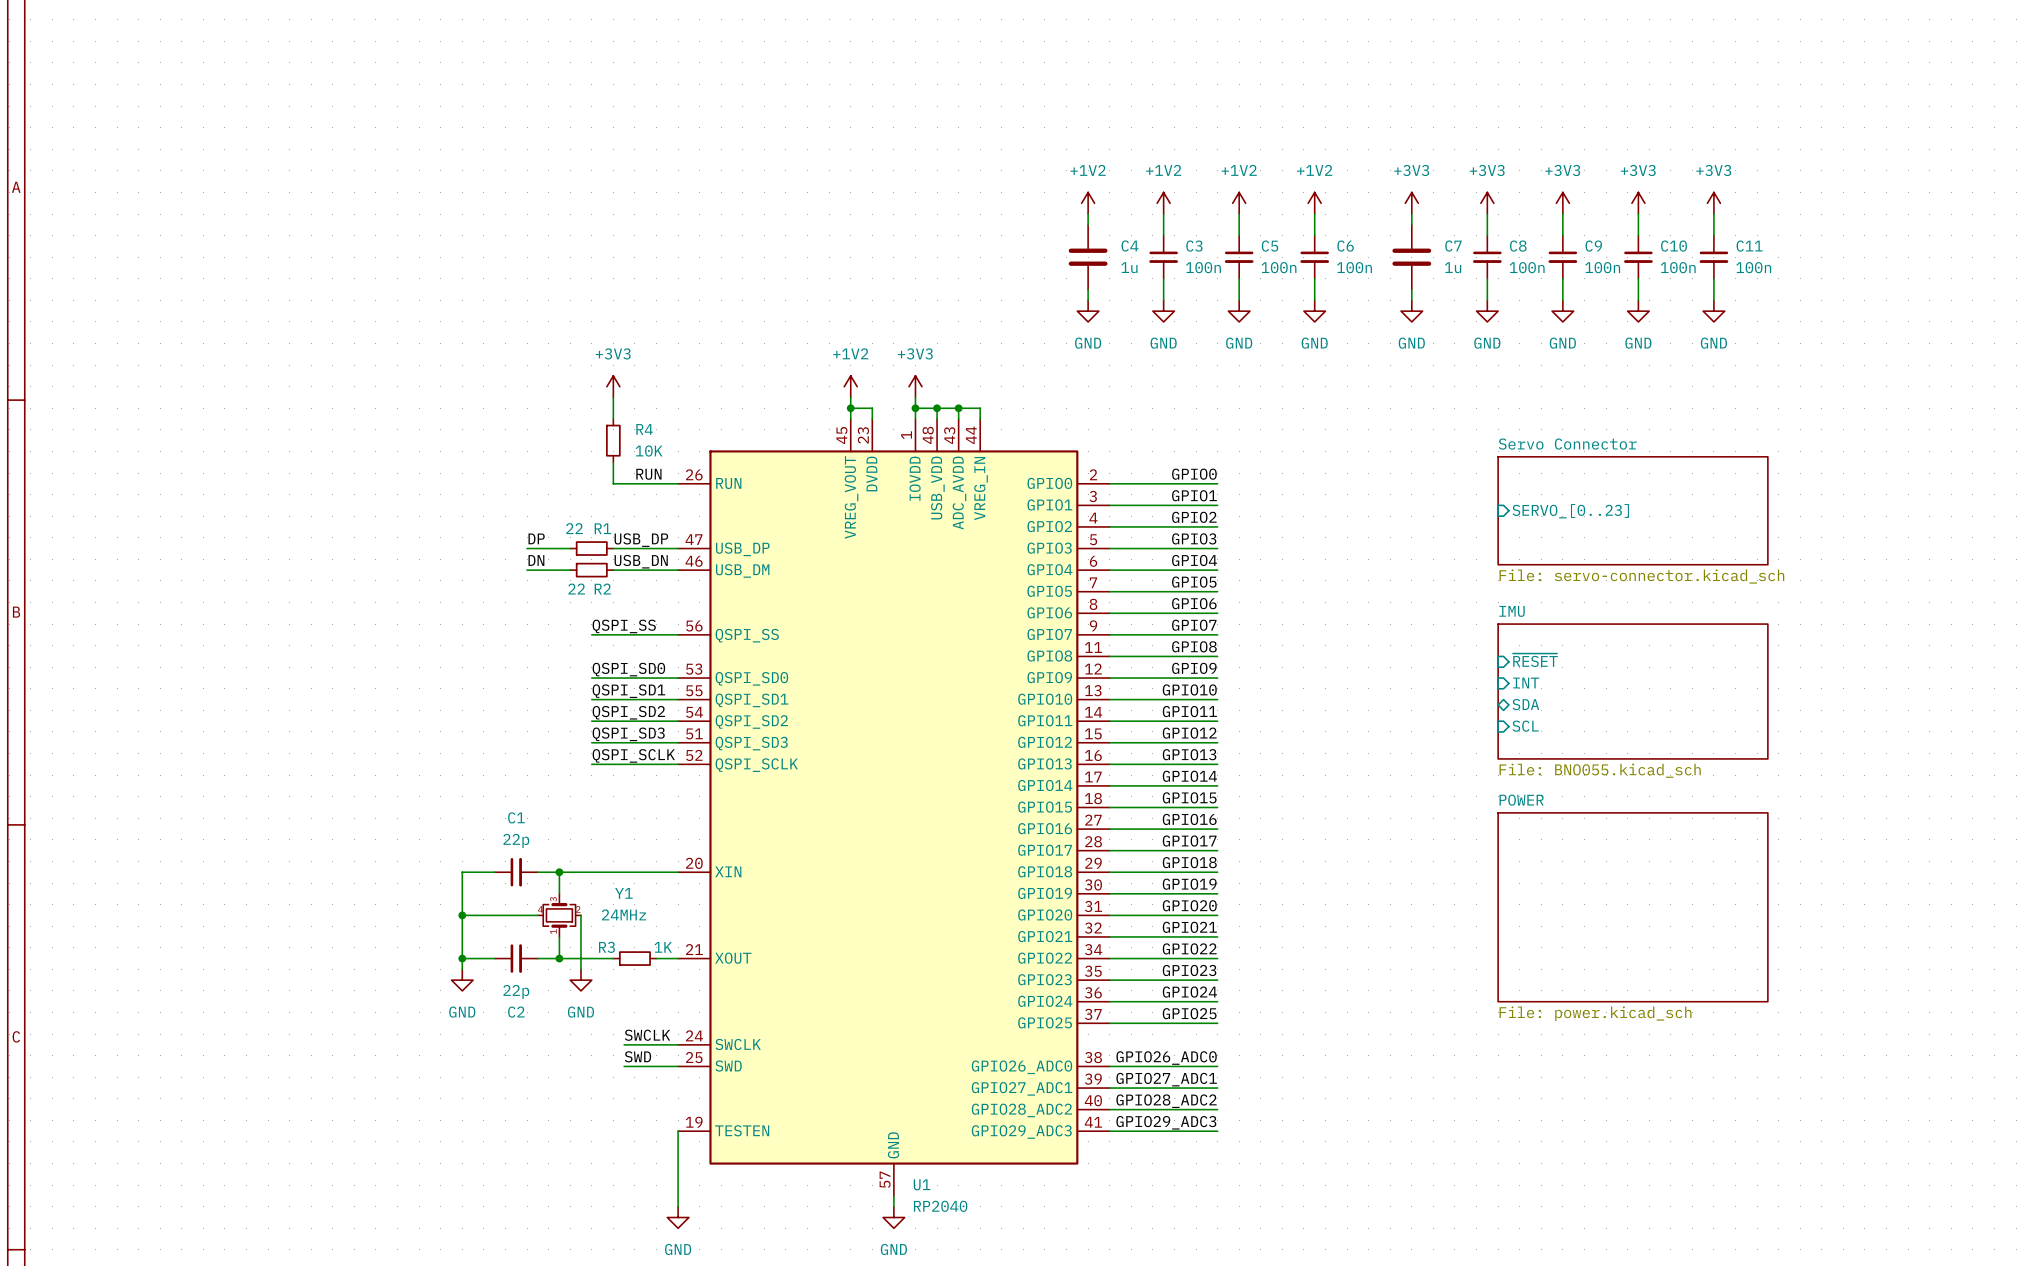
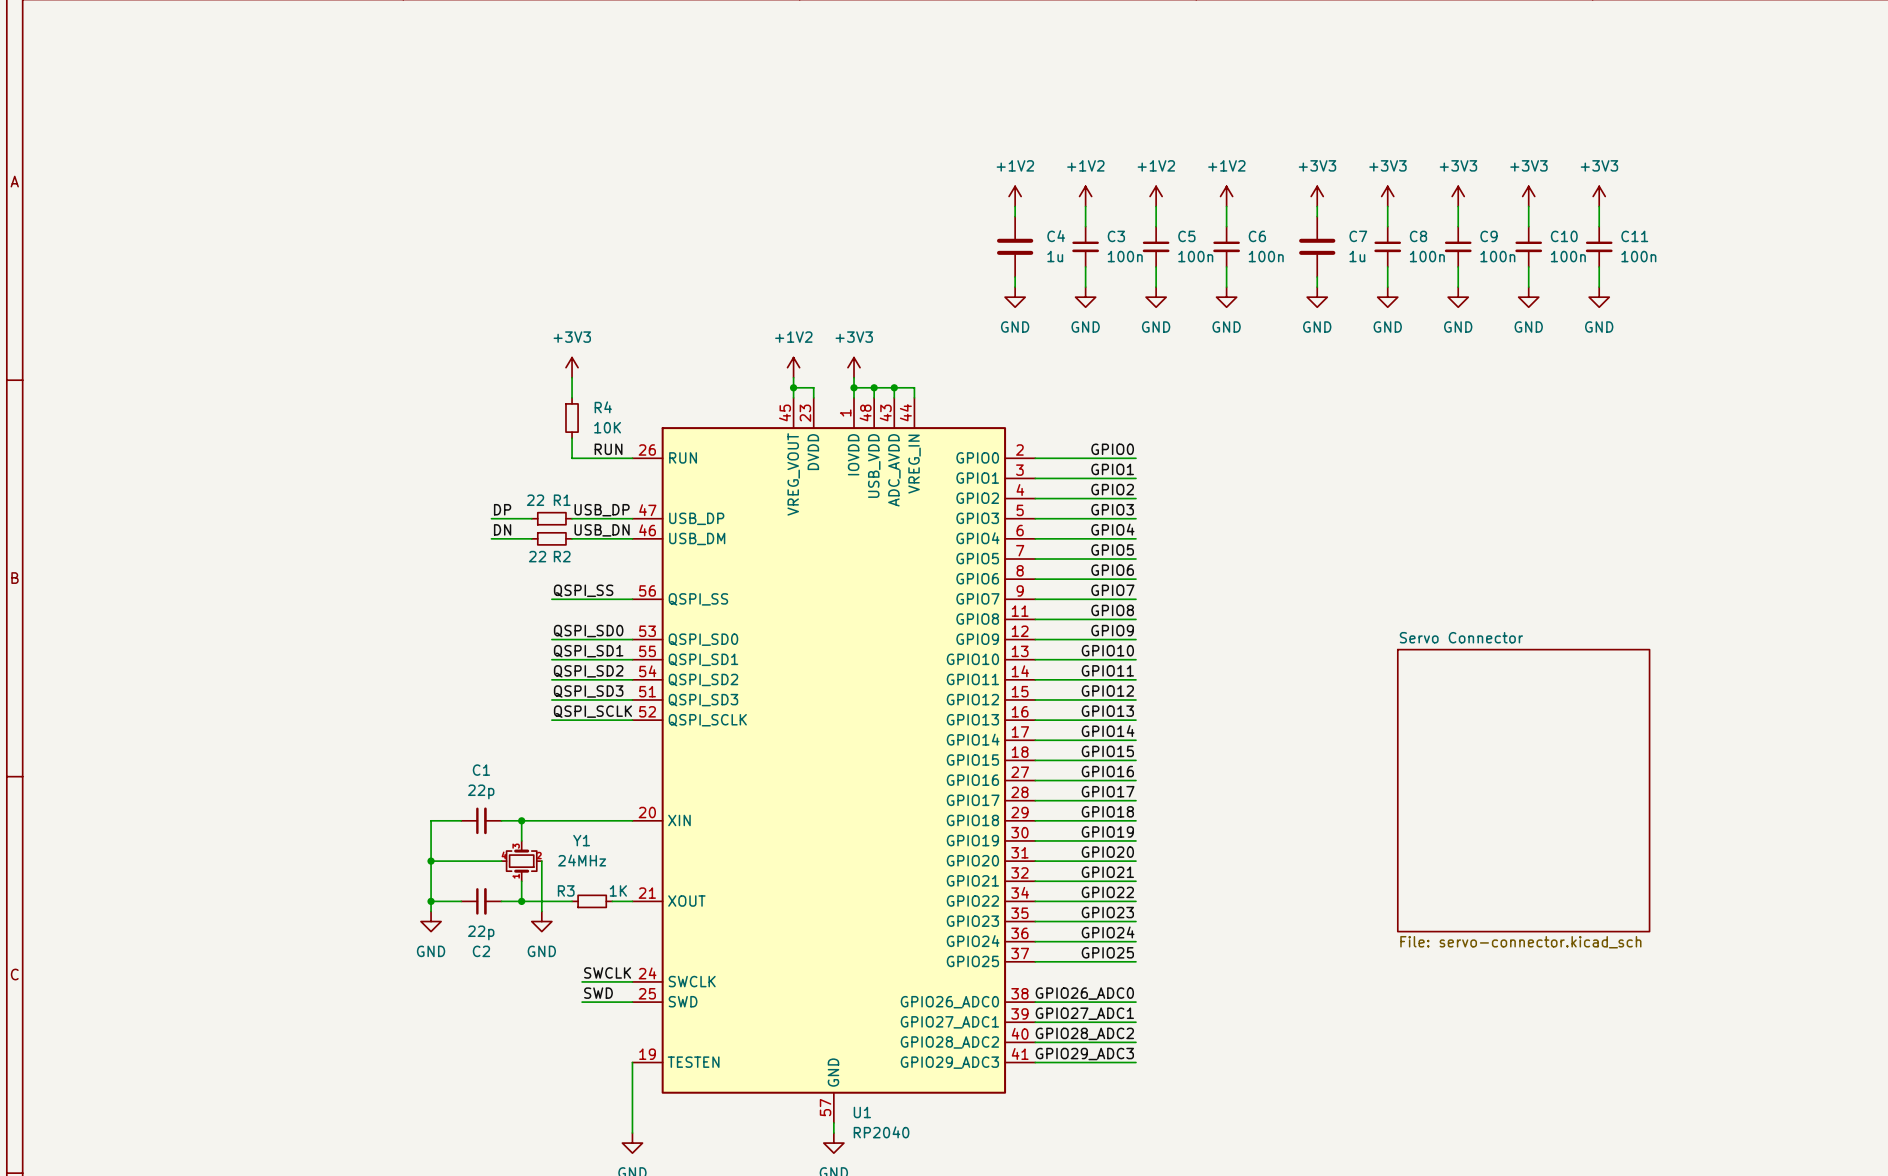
sheet Servo Connector: File: servo-connector.kicad_sch (1633, 510) -> none
sheet pin: SERVO_[0..23] (1570, 511) -> none
sheet pin: ~{RESET} (1535, 660) -> none
sheet pin: INT (1526, 683) -> none
sheet IMU: File: BNO055.kicad_sch (1633, 691) -> none
sheet pin: SDA (1525, 704) -> none
sheet pin: SCL (1525, 726) -> none
sheet Servo Connector: none -> File: servo-connector.kicad_sch (1523, 790)
sheet POWER: File: power.kicad_sch (1633, 907) -> none

